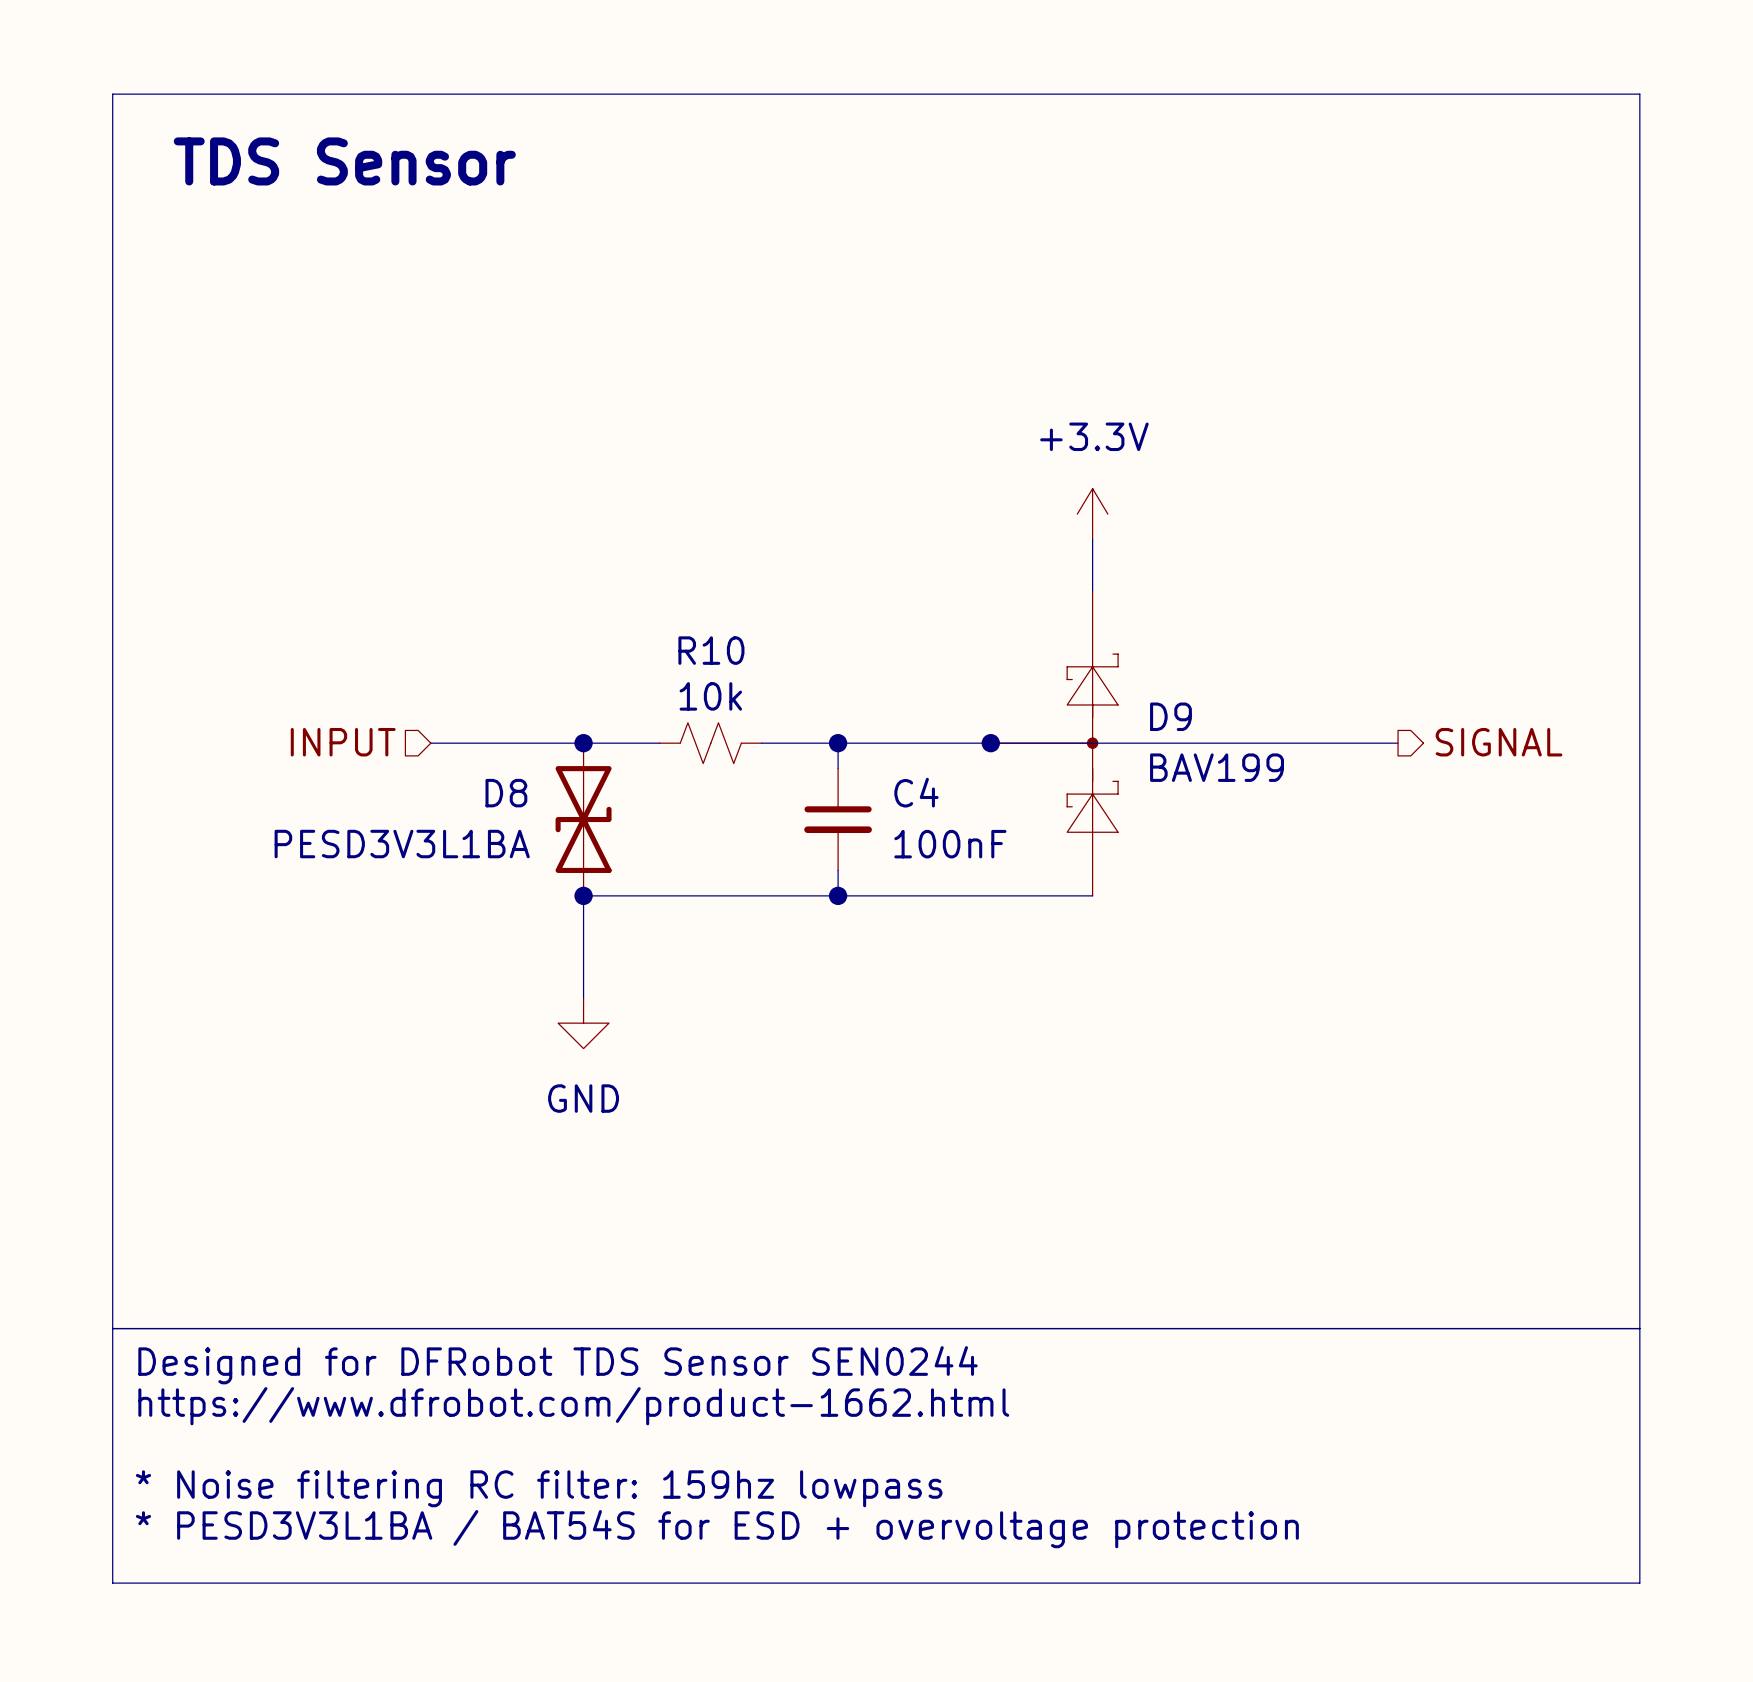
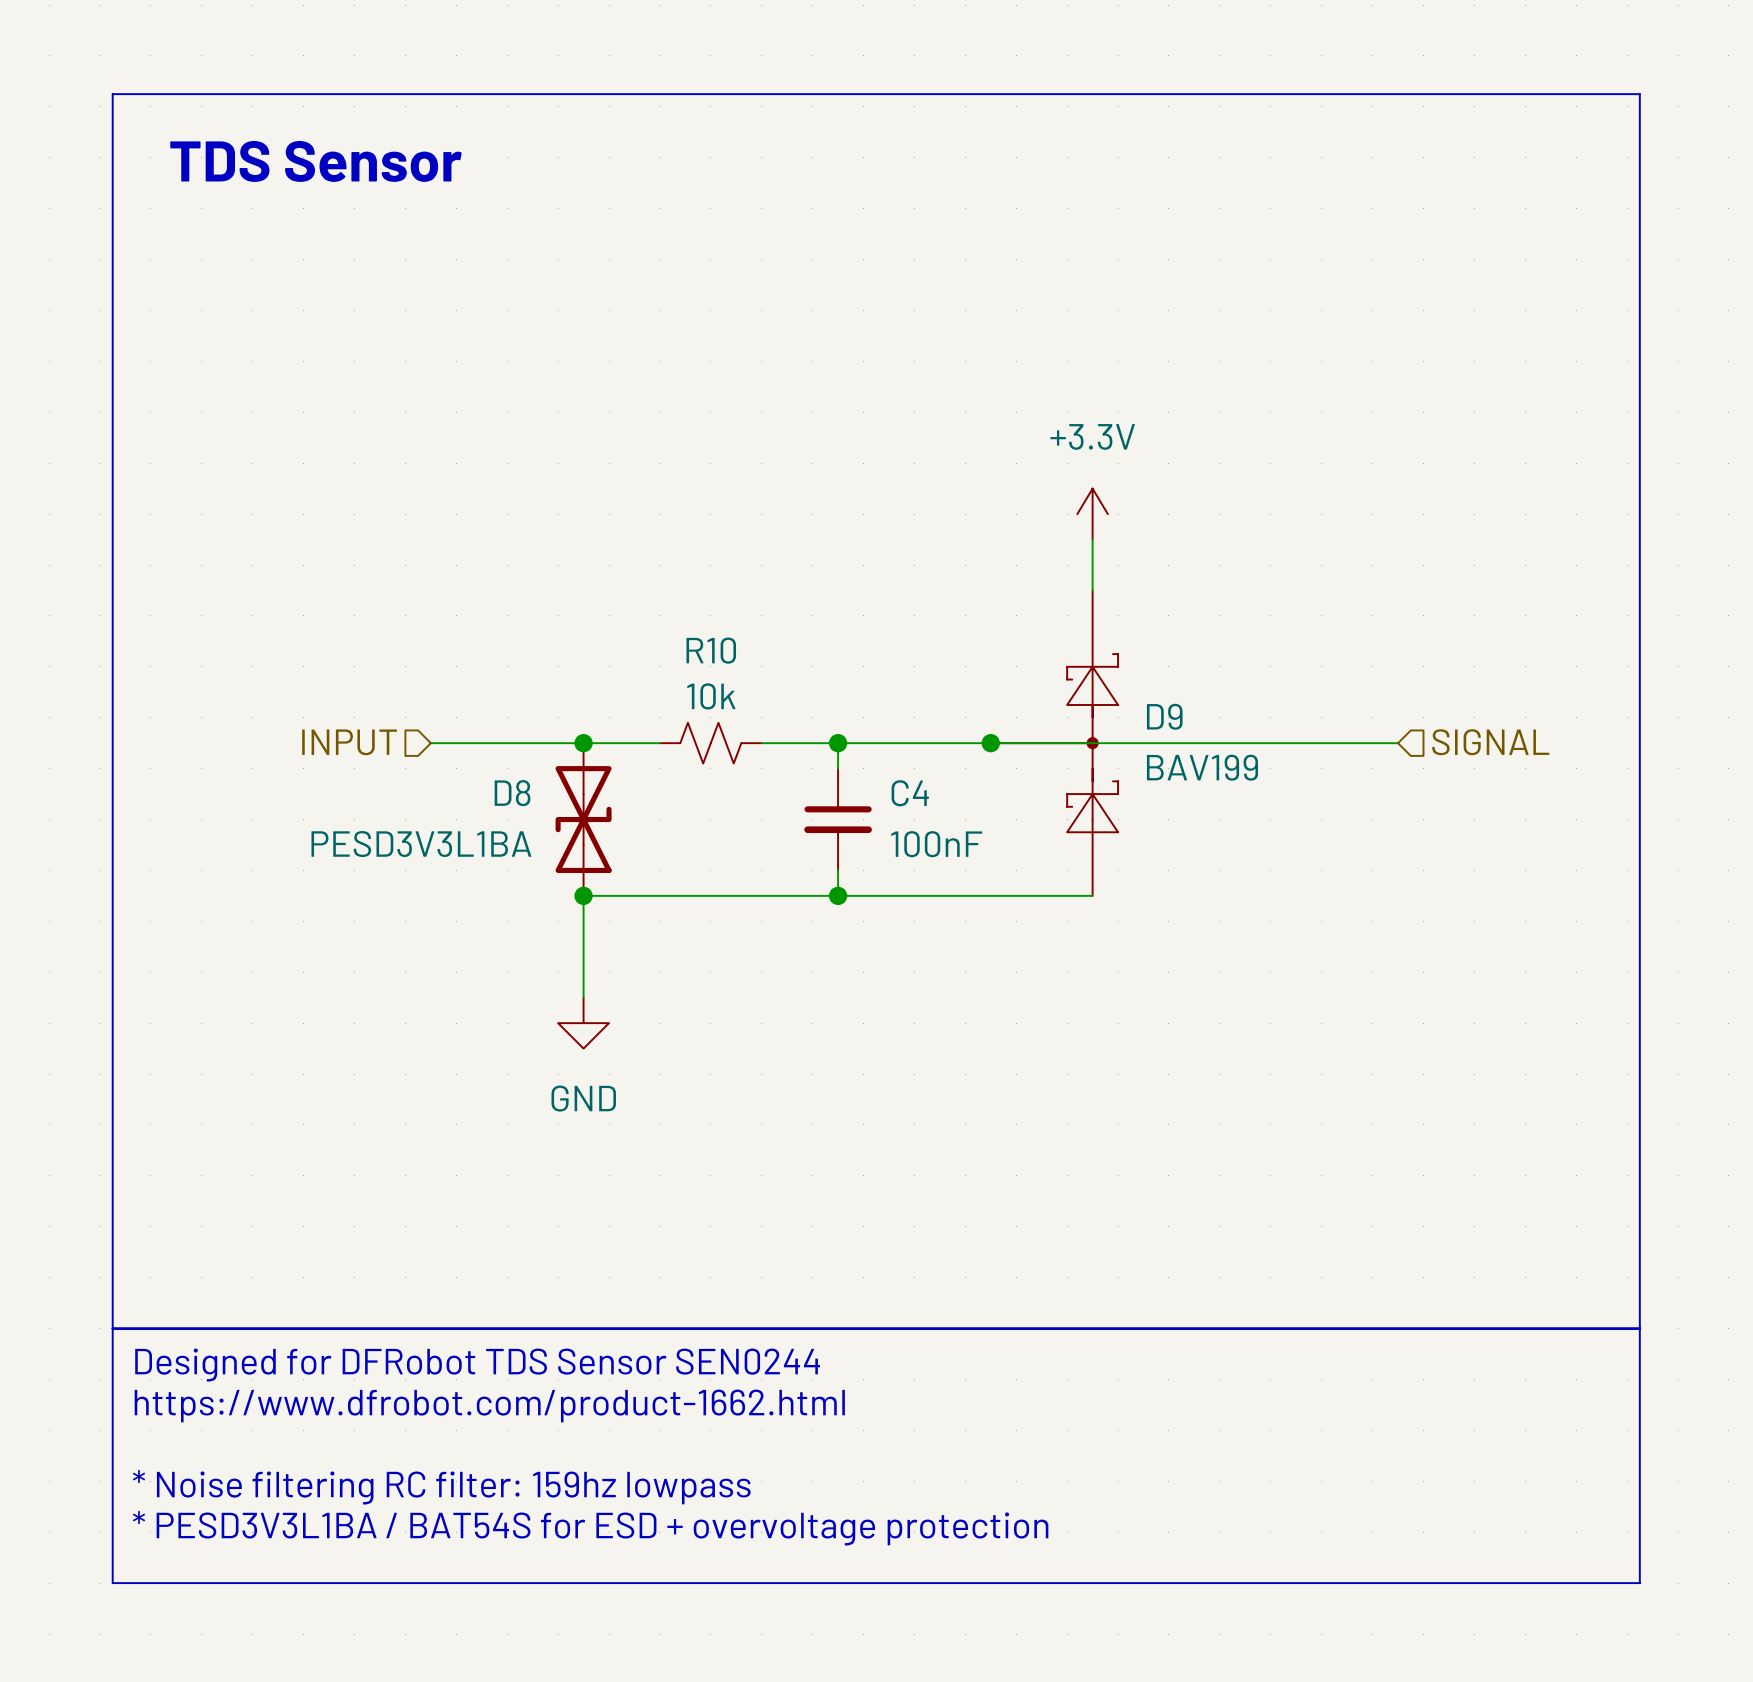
hierarchical label shape: output (1499, 742) -> input (1490, 742)

